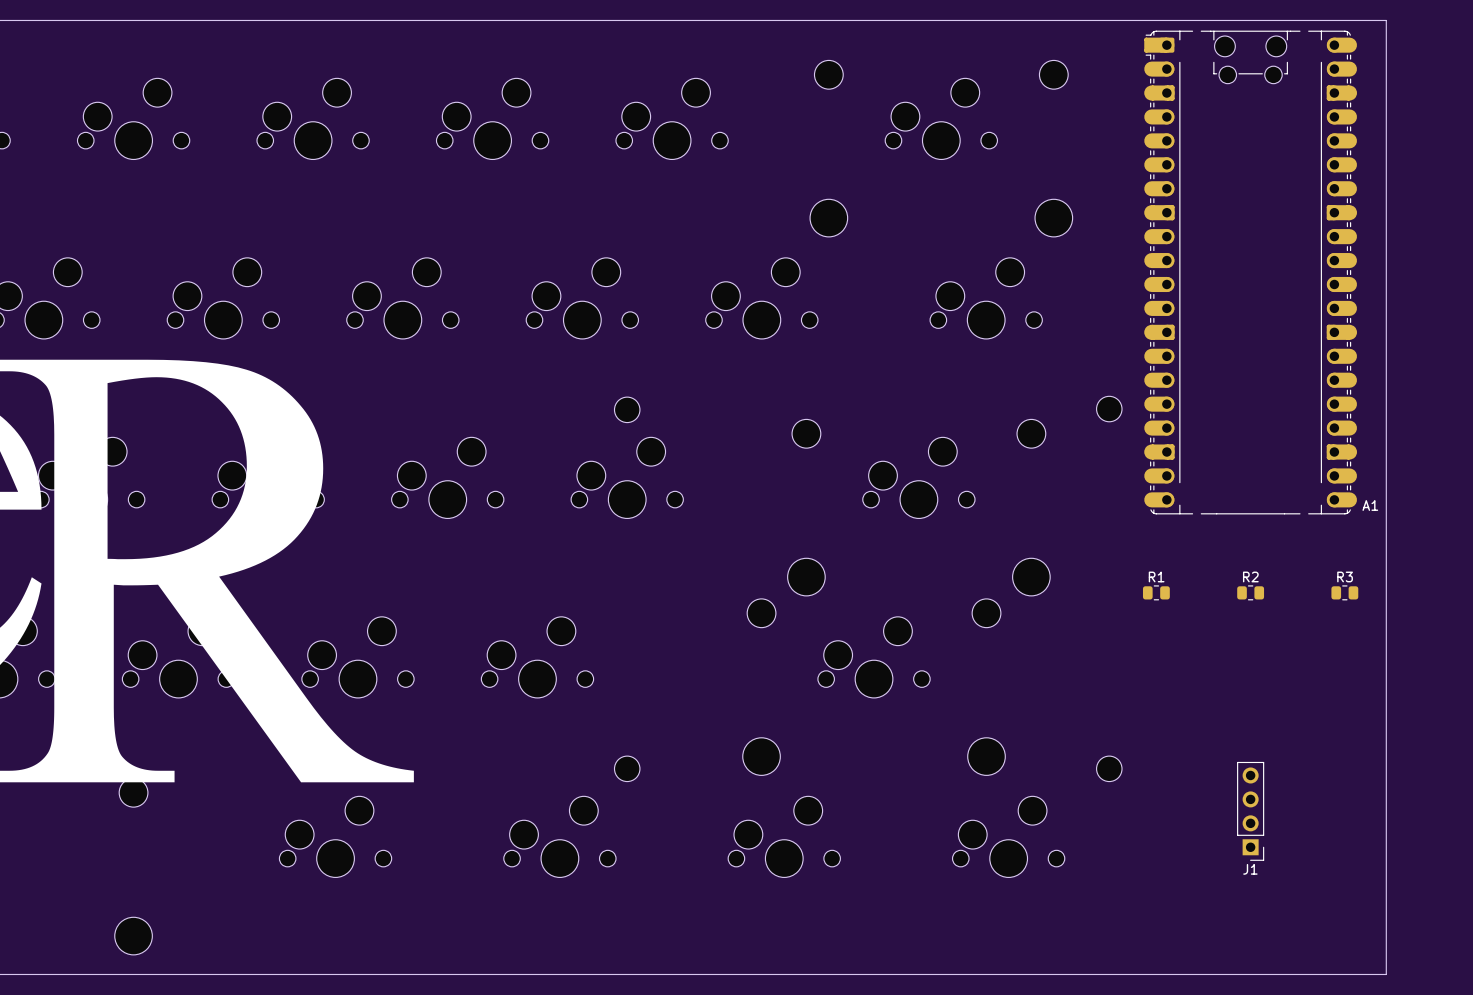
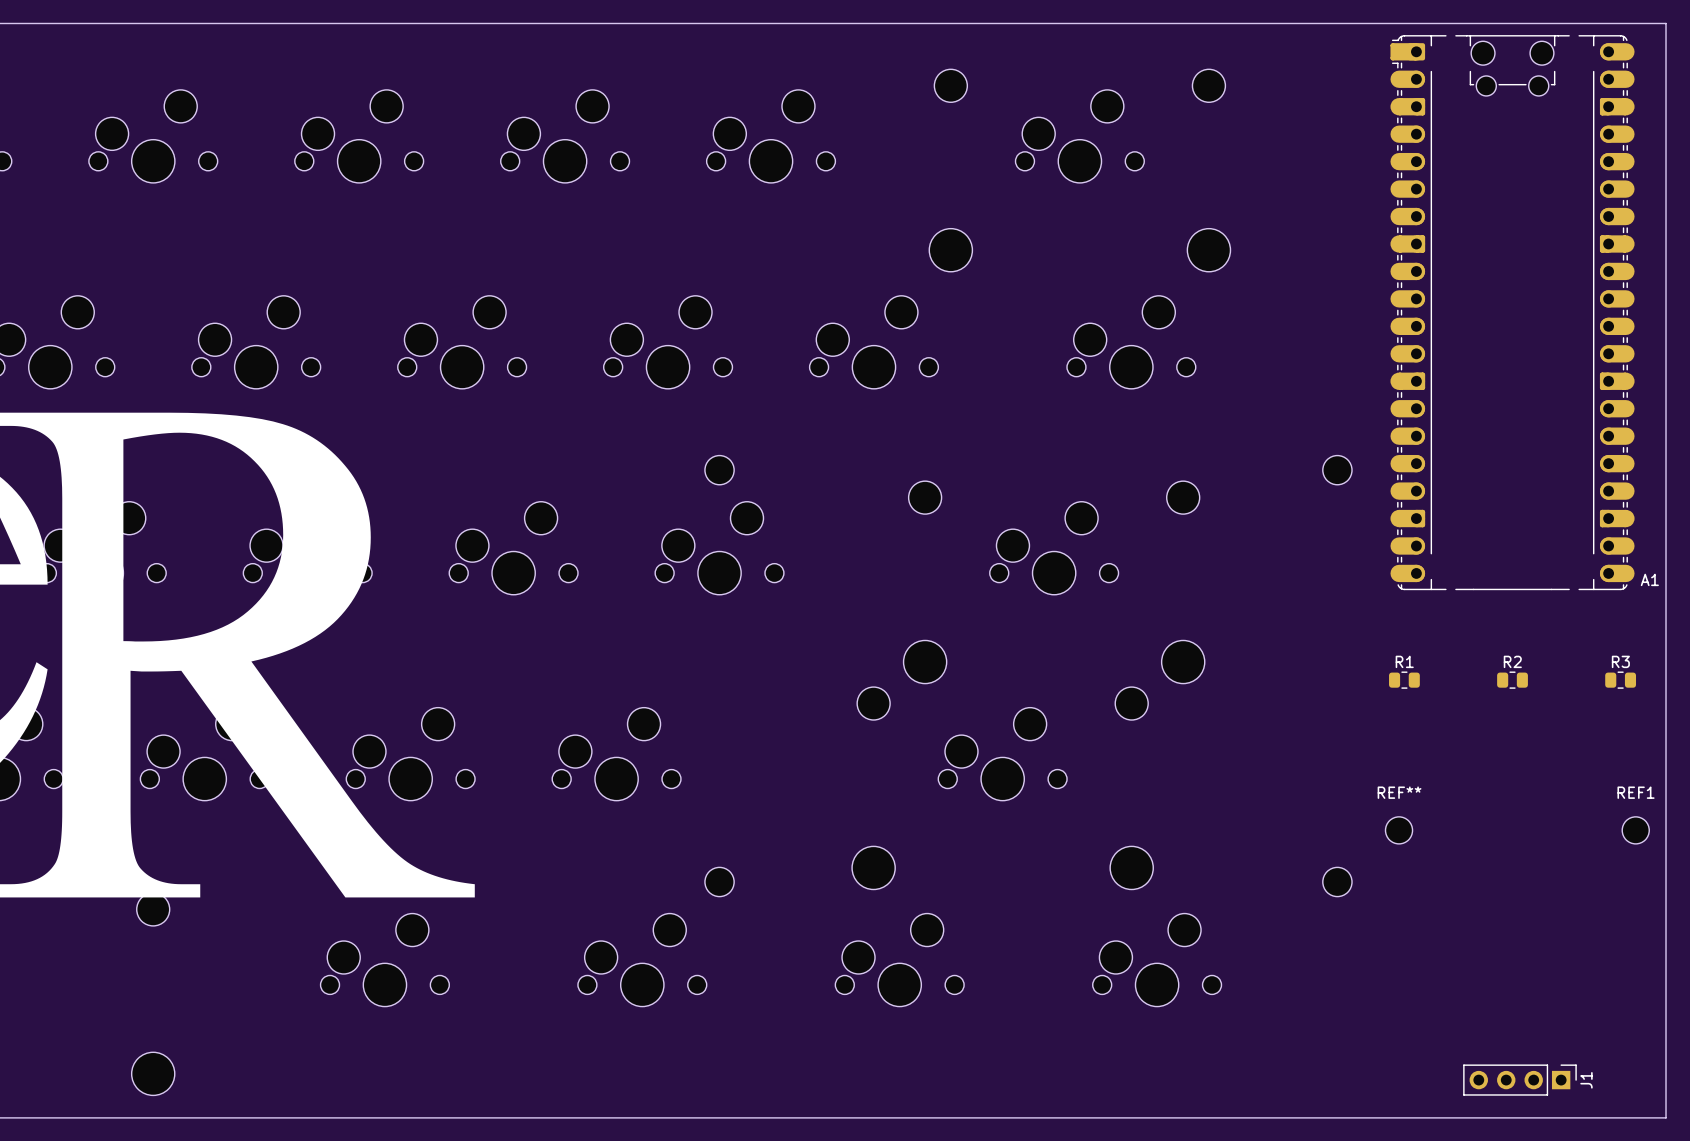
board edge: (1386, 20) (1386, 974) -> (1590, 23) (1666, 23) (1666, 1117) (1590, 1117)
A1 position: (1250, 272) -> (1512, 312)
part position: (1109, 409) -> (1337, 470)
R1 position: (1156, 592) -> (1404, 680)
R2 position: (1250, 592) -> (1512, 680)
R3 position: (1344, 592) -> (1620, 680)
REF**: none -> (1399, 830)
REF1: none -> (1635, 830)
part position: (1109, 768) -> (1337, 881)
J1 rotation: 0° (1250, 811) -> 90° counterclockwise (1519, 1080)
J1 position: (1250, 811) -> (1519, 1080)

